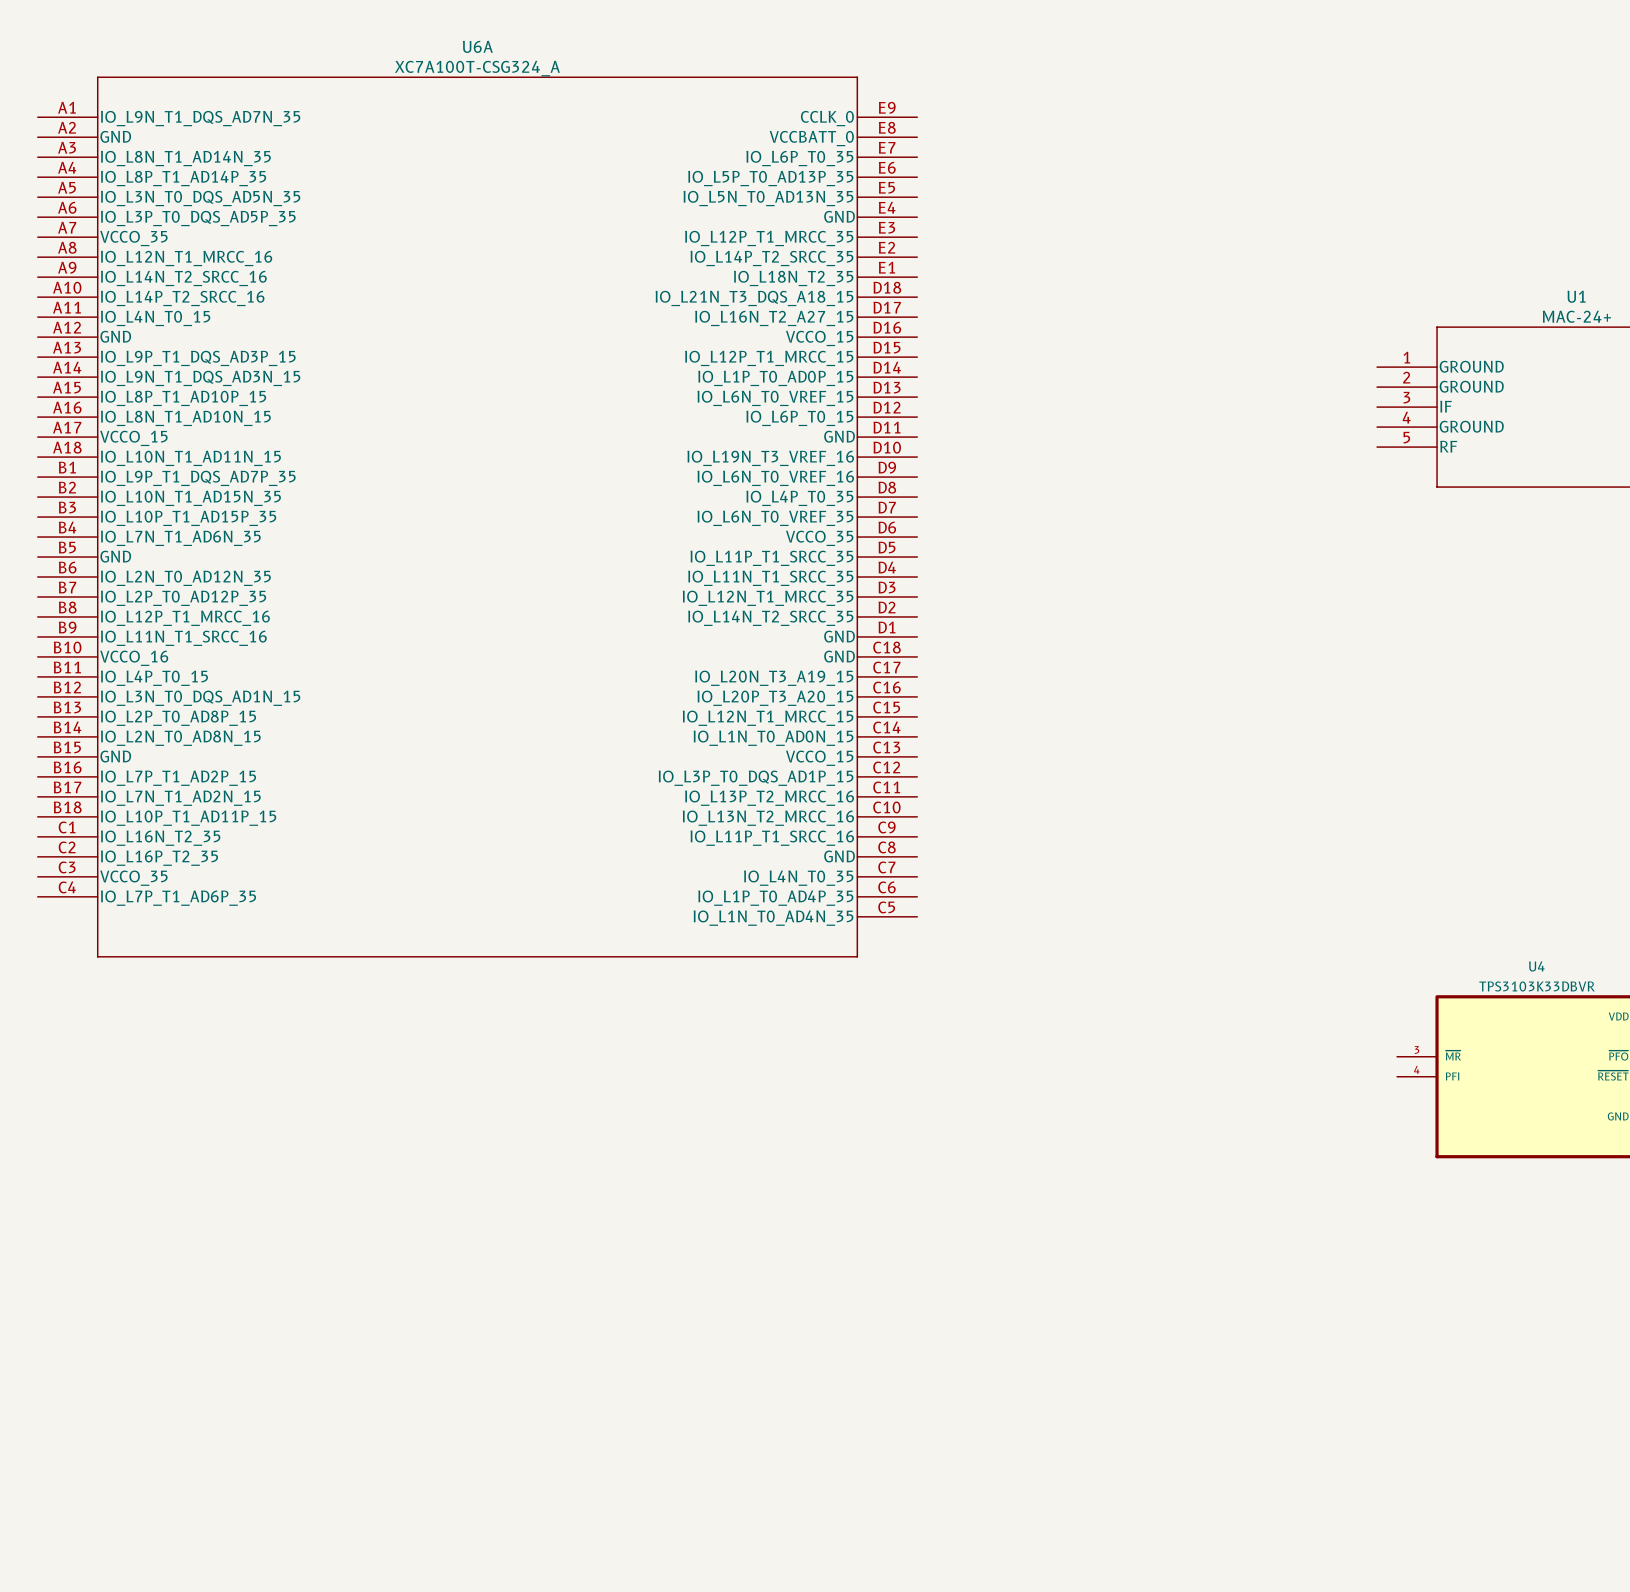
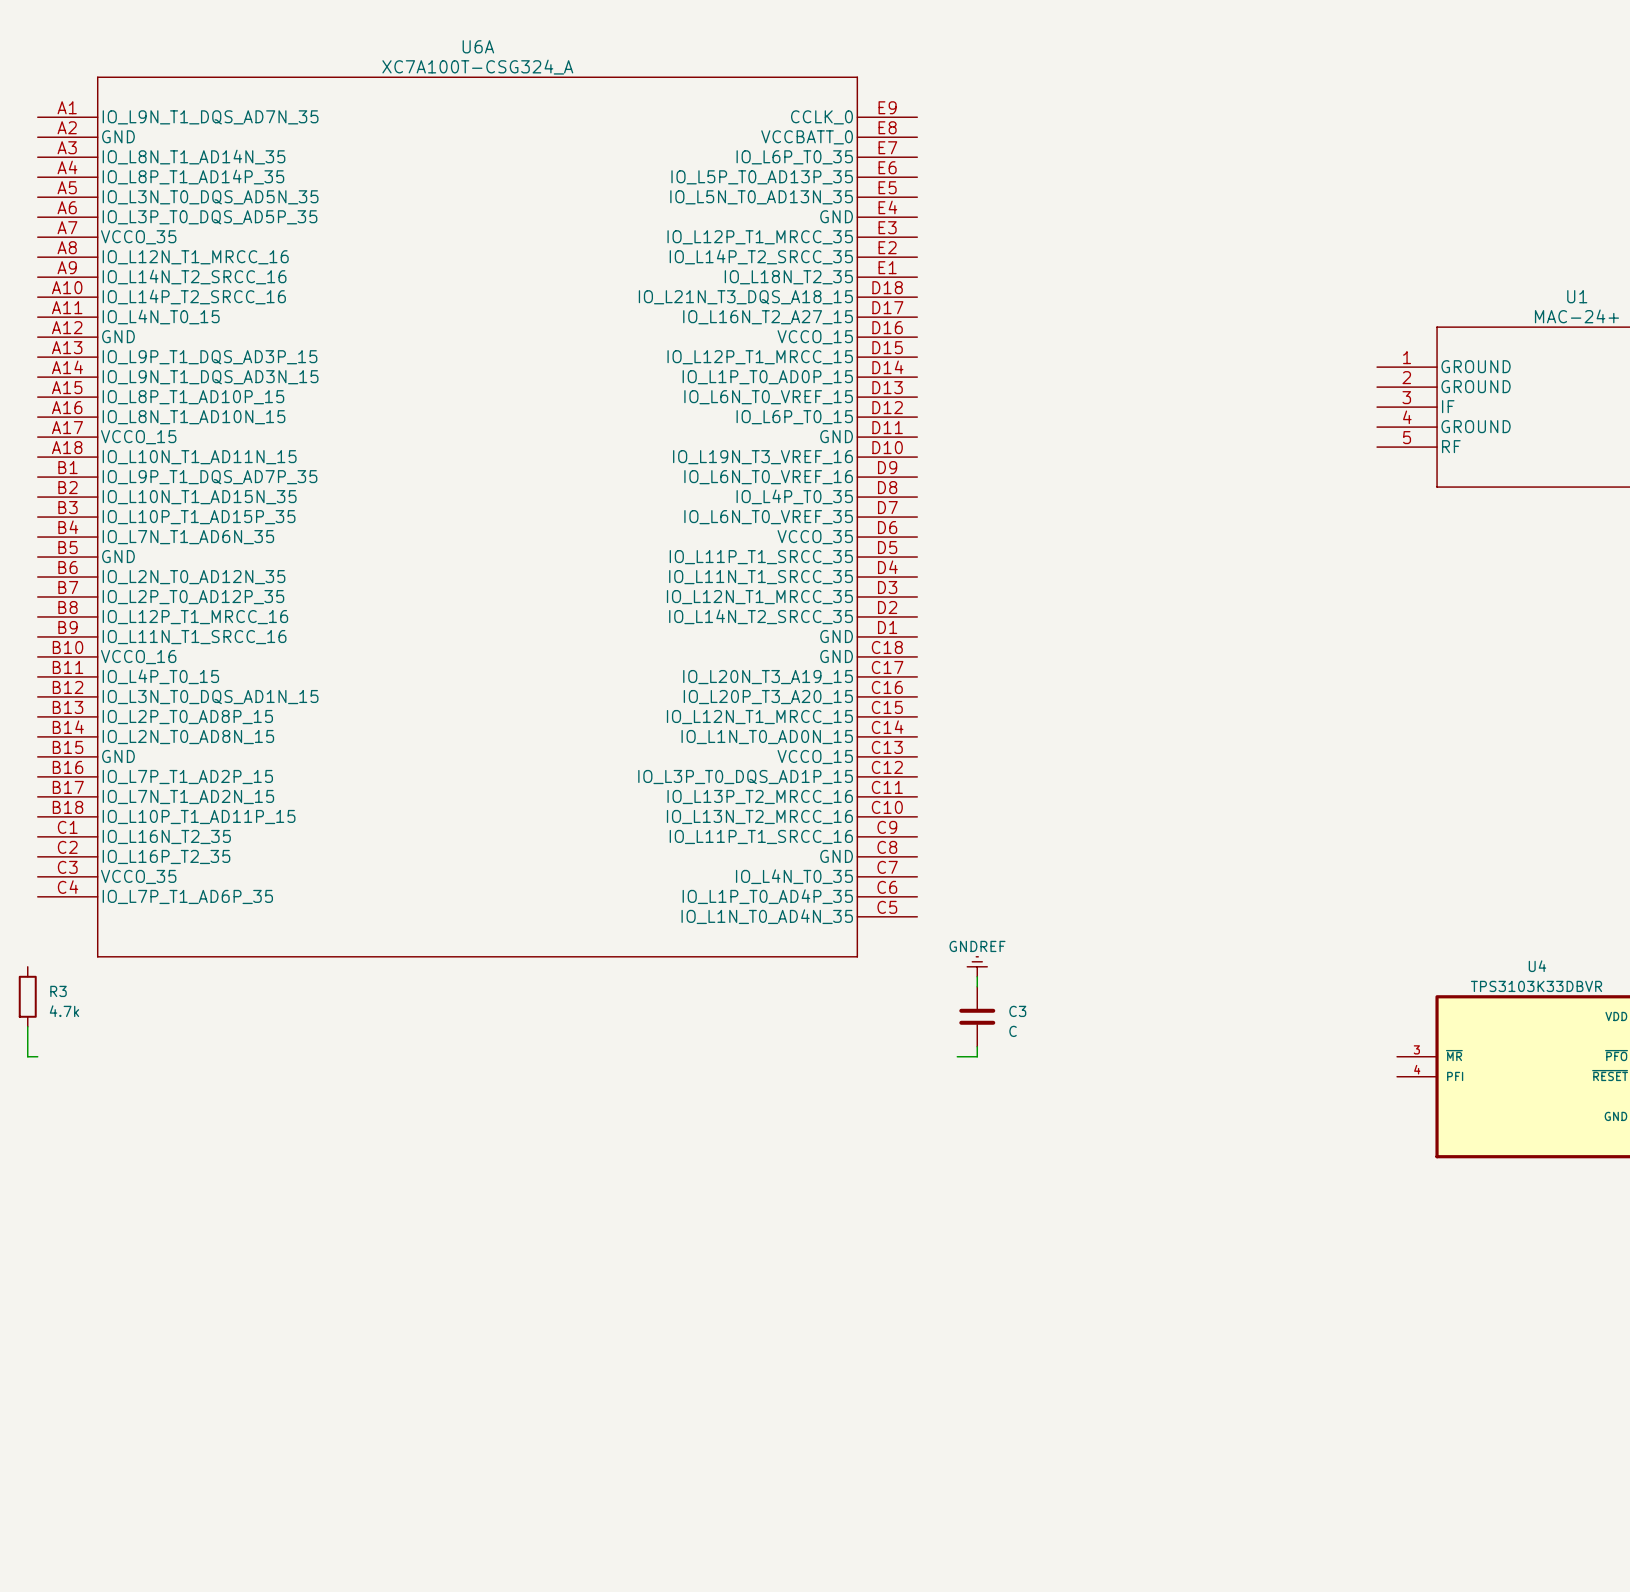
power symbol: none -> GNDREF (977, 966)
wire: none -> (977, 976) (977, 986)
R3: none -> 4.7k (27, 996)
C3: none -> C (977, 1016)
wire: none -> (27, 1026) (27, 1056) (37, 1056)
wire: none -> (977, 1046) (977, 1056) (957, 1056)

